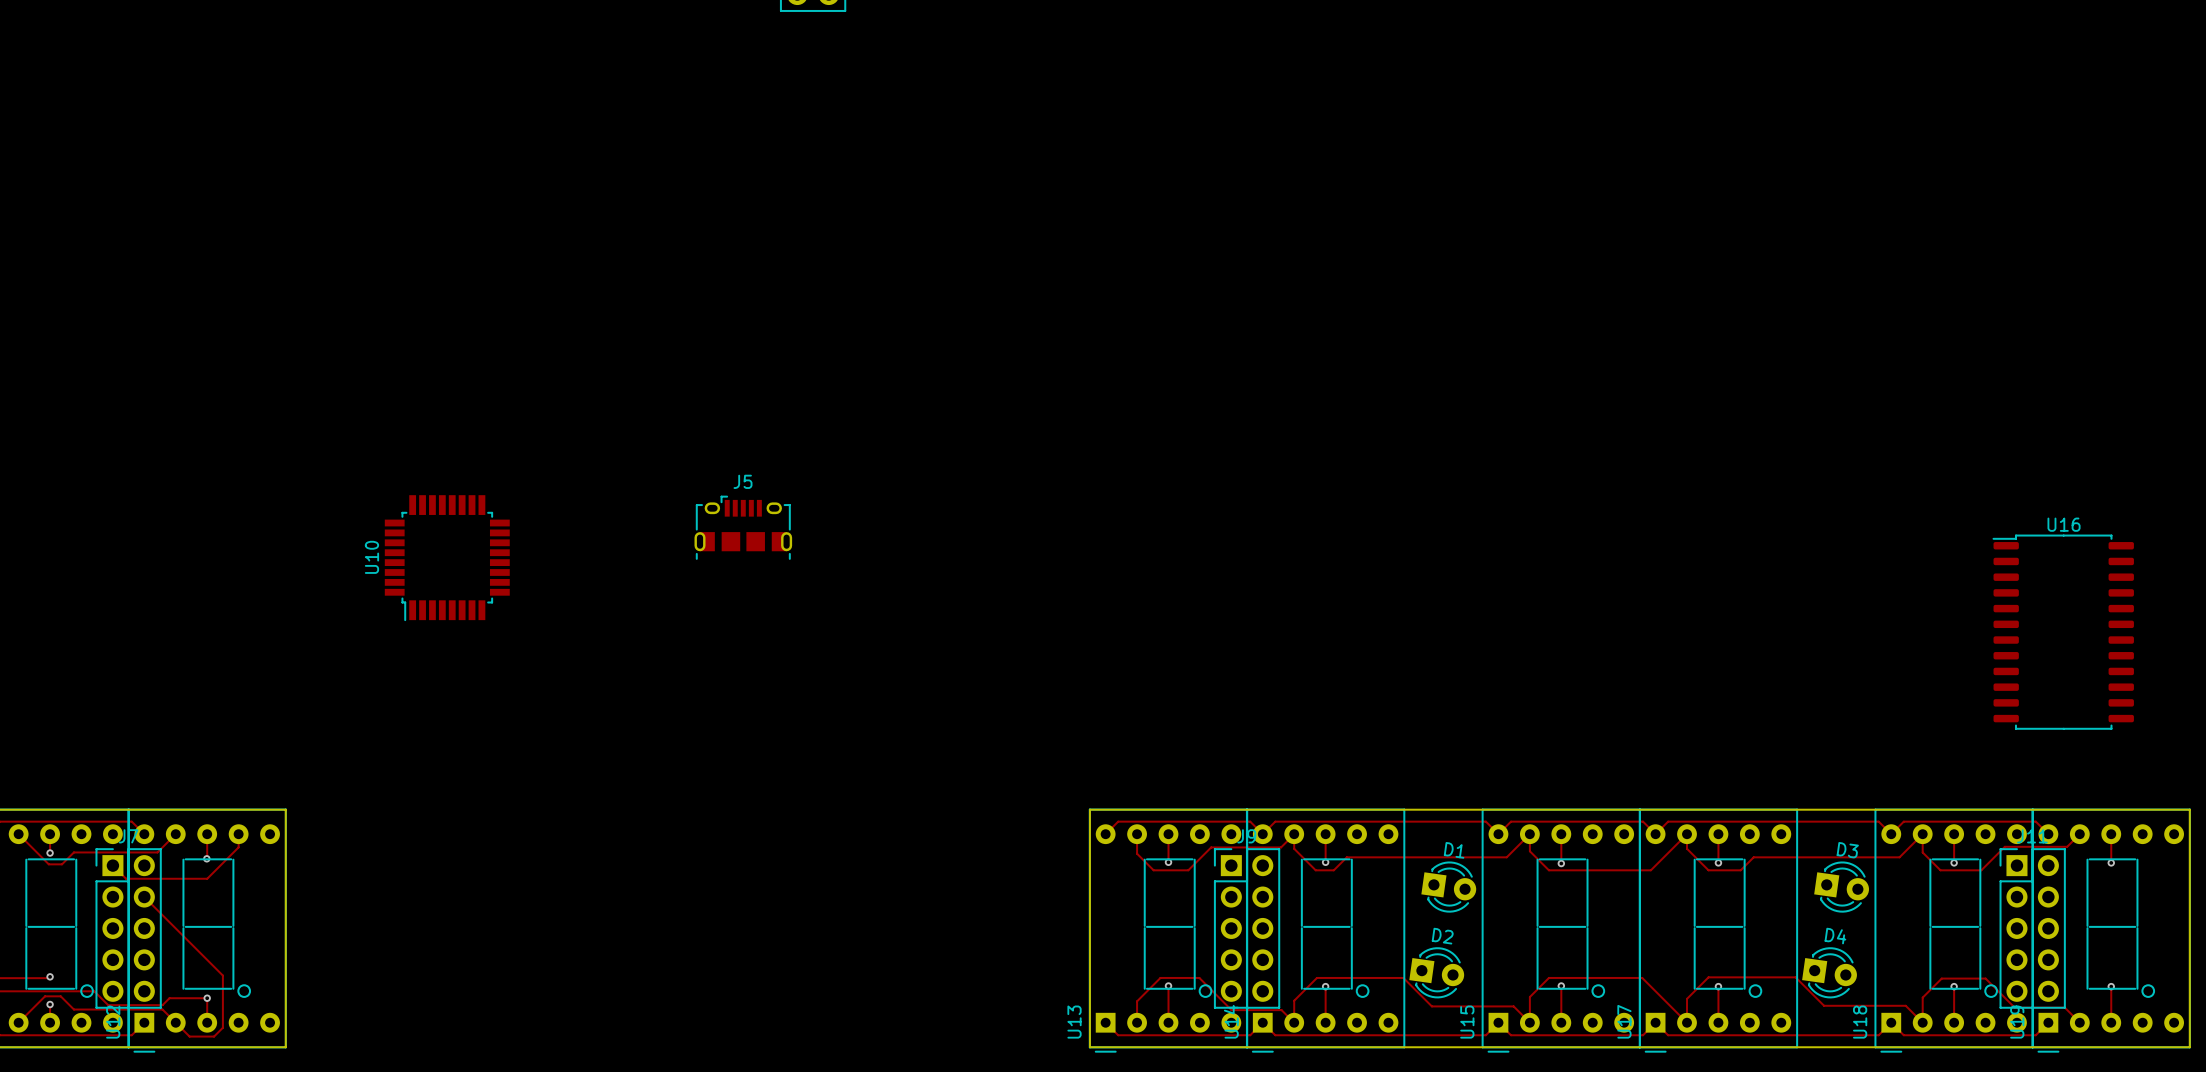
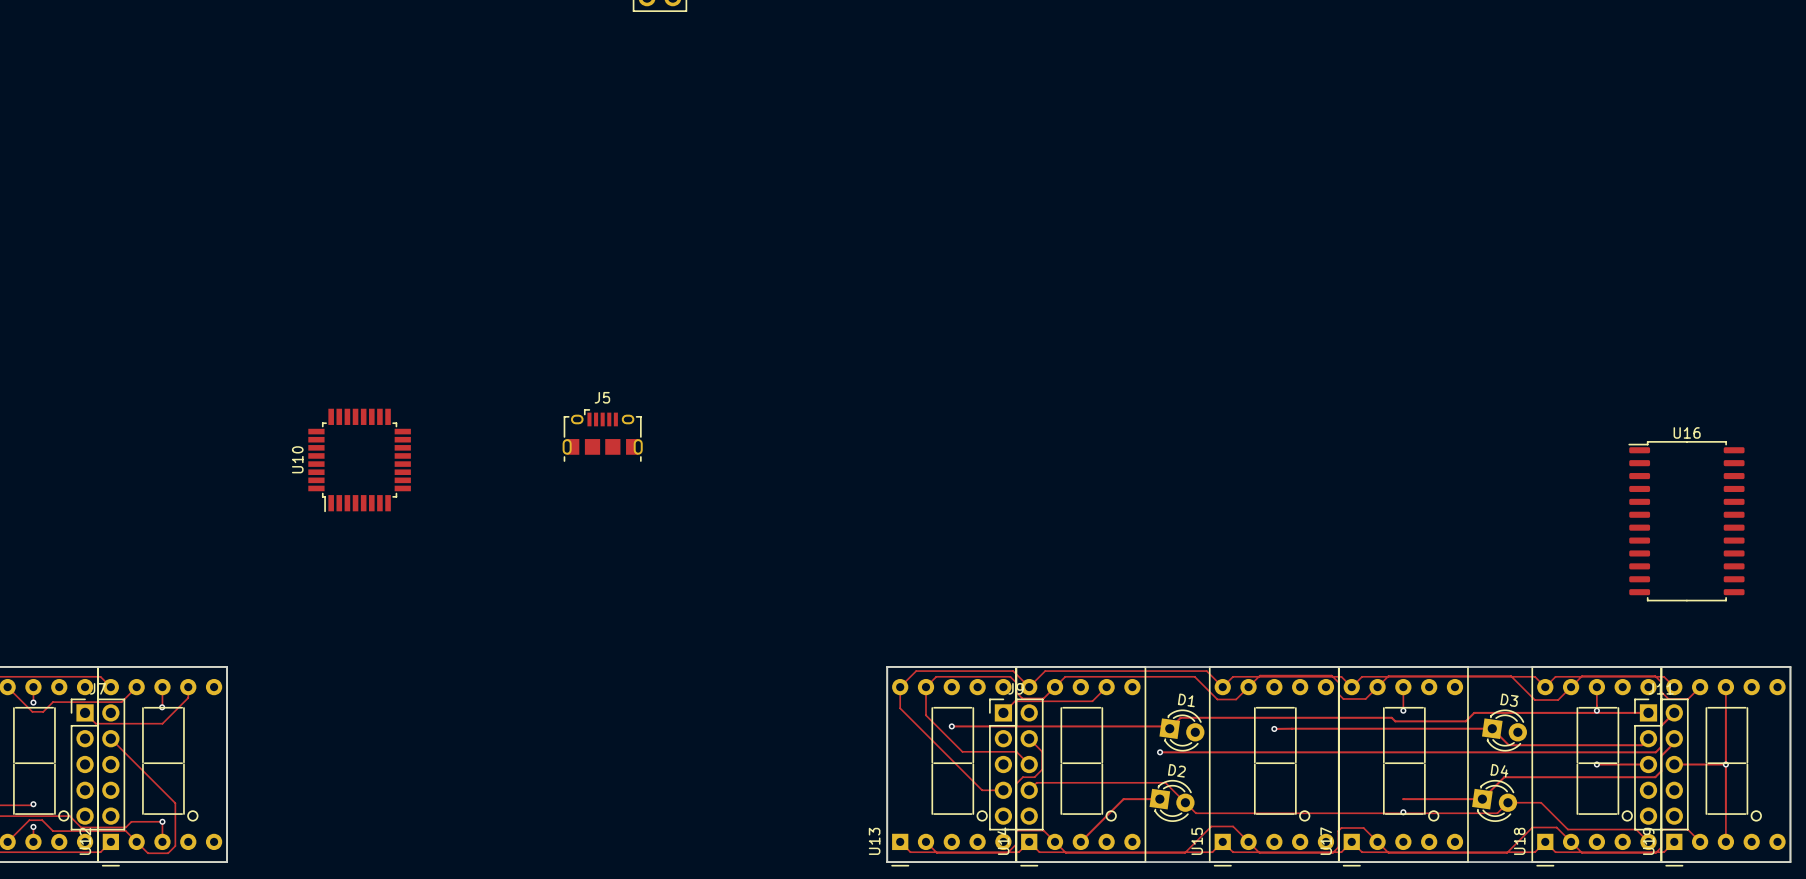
track: (1118, 821) (1149, 821) -> (926, 687) (936, 676)
track: (1239, 821) (1250, 821) -> (910, 676) (916, 671) (1013, 671) (1018, 676)
track: (1275, 821) (1306, 821) -> (1010, 676) (1016, 682) (1016, 692) (1022, 698) (1043, 698) (1065, 676)
track: none -> (1039, 676) (1045, 671) (1206, 671) (1212, 676)
track: (1464, 821) (1485, 821) -> (1194, 676) (1217, 699) (1236, 699)
track: none -> (900, 687) (900, 708) (982, 790) (1003, 790)
track: (1168, 834) (1168, 862) -> none
track: (1294, 834) (1281, 847) (1211, 847) (1188, 870) (1153, 870) (1137, 853) -> (1029, 764) (1016, 751) (962, 751) (926, 715) (926, 703)
track: (1294, 834) (1294, 848) (1315, 870) (1333, 870) (1346, 857) (1506, 857) (1514, 849) -> none
track: (1325, 834) (1325, 862) -> none
track: none -> (1106, 687) (1092, 701) (1015, 701) (1003, 712)
track: (1529, 834) (1529, 851) (1548, 870) (1650, 870) (1672, 848) -> (1248, 687) (1260, 675) (1331, 675) (1338, 682) (1338, 694) (1343, 698) (1365, 698)
track: (1561, 834) (1561, 863) -> none
track: (1687, 834) (1687, 848) (1708, 870) (1740, 870) (1753, 857) (1899, 857) (1906, 849) -> (1377, 687) (1388, 676) (1511, 676) (1534, 700) (1558, 700)
track: (1922, 834) (1922, 852) (1940, 870) (1981, 870) (2004, 846) (2067, 846) -> (1571, 687) (1582, 676) (1655, 676) (1660, 681) (1660, 691) (1668, 698) (1689, 697)
via position: (1168, 862) -> (951, 726)
via: (1325, 862) -> none
track: none -> (1725, 710) (1725, 812)
via: (2111, 862) -> none
via position: (1561, 863) -> (1274, 728)
track: none -> (1648, 712) (1474, 712) (1465, 721) (1395, 721) (1391, 717) (1180, 717) (1169, 728) (1167, 726) (951, 726)
track: none -> (1674, 712) (1660, 726) (1660, 747) (1655, 752) (1160, 752)
track: none -> (1274, 728) (1492, 728) (1508, 745) (1641, 745) (1648, 738)
track: none -> (1029, 738) (1042, 751) (1042, 769) (1034, 777) (1022, 777) (1016, 783) (1016, 844) (1007, 852) (936, 852) (926, 841)
track: none -> (1674, 738) (1674, 742) (1661, 755) (1661, 771) (1655, 777) (1504, 777) (1482, 799) (1403, 799)
via: none -> (1160, 752)
track: none -> (1596, 764) (1648, 764)
track: none -> (1674, 764) (1725, 764)
via: none -> (1725, 764)
track: none -> (1029, 790) (1036, 782) (1165, 782) (1195, 813) (1497, 813) (1507, 802) (1541, 802) (1567, 829) (1636, 829) (1648, 841)
track: (1168, 986) (1168, 1022) -> none
via: (1168, 986) -> none
track: (1325, 986) (1325, 1022) -> (1159, 799) (1123, 799) (1080, 841)
via: (1325, 986) -> none
track: (1561, 986) (1561, 1022) -> none
via: (1561, 986) -> none
track: (1718, 986) (1718, 1022) -> none
track: (1954, 986) (1954, 1022) -> none
via position: (1954, 986) -> (1596, 764)
via: (2111, 986) -> none
track: (1670, 1005) (1642, 977) (1548, 977) (1529, 997) (1529, 1022) -> none
track: (1905, 1005) (1824, 1005) (1795, 977) (1708, 977) (1687, 998) (1687, 1022) -> (1557, 828) (1532, 827) (1506, 852) (1388, 852) (1377, 841)
track: (2032, 1007) (2014, 1007) (1985, 978) (1941, 978) (1922, 997) (1922, 1022) -> (1661, 829) (1661, 847) (1655, 852) (1582, 852) (1571, 841)
track: (1281, 1010) (1231, 1010) (1199, 977) (1160, 977) (1137, 1001) (1137, 1022) -> (1044, 831) (1016, 830)
track: (1529, 1022) (1513, 1006) (1431, 1006) (1403, 977) (1316, 977) (1294, 1000) (1294, 1022) -> (1363, 828) (1341, 828) (1338, 831) (1338, 847) (1332, 852) (1259, 852) (1233, 826) (1211, 826) (1184, 852) (1066, 852) (1055, 841)

